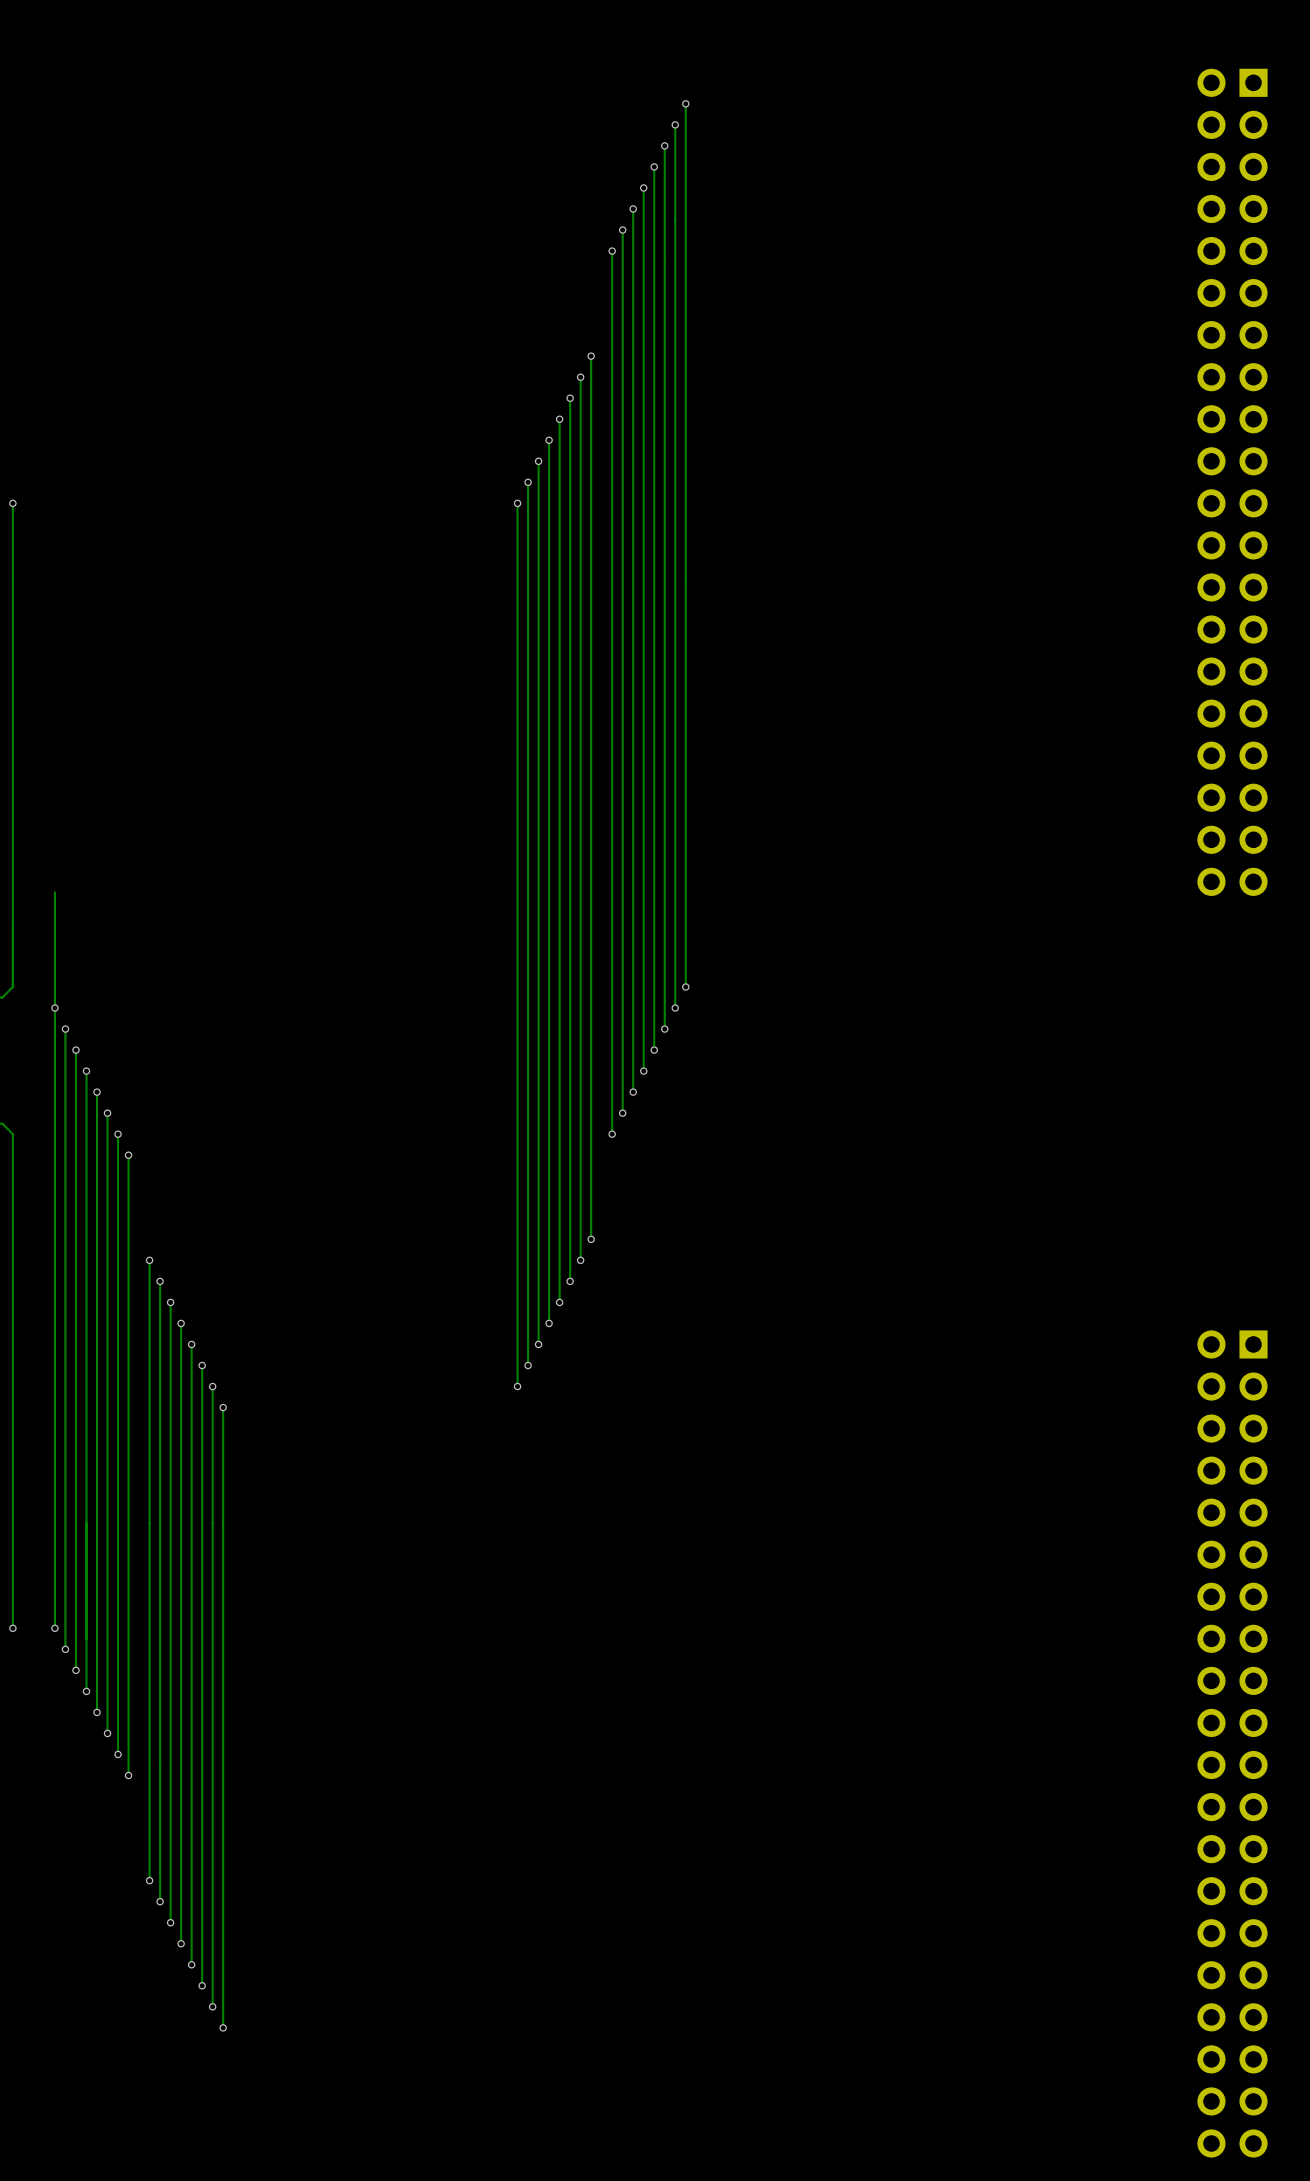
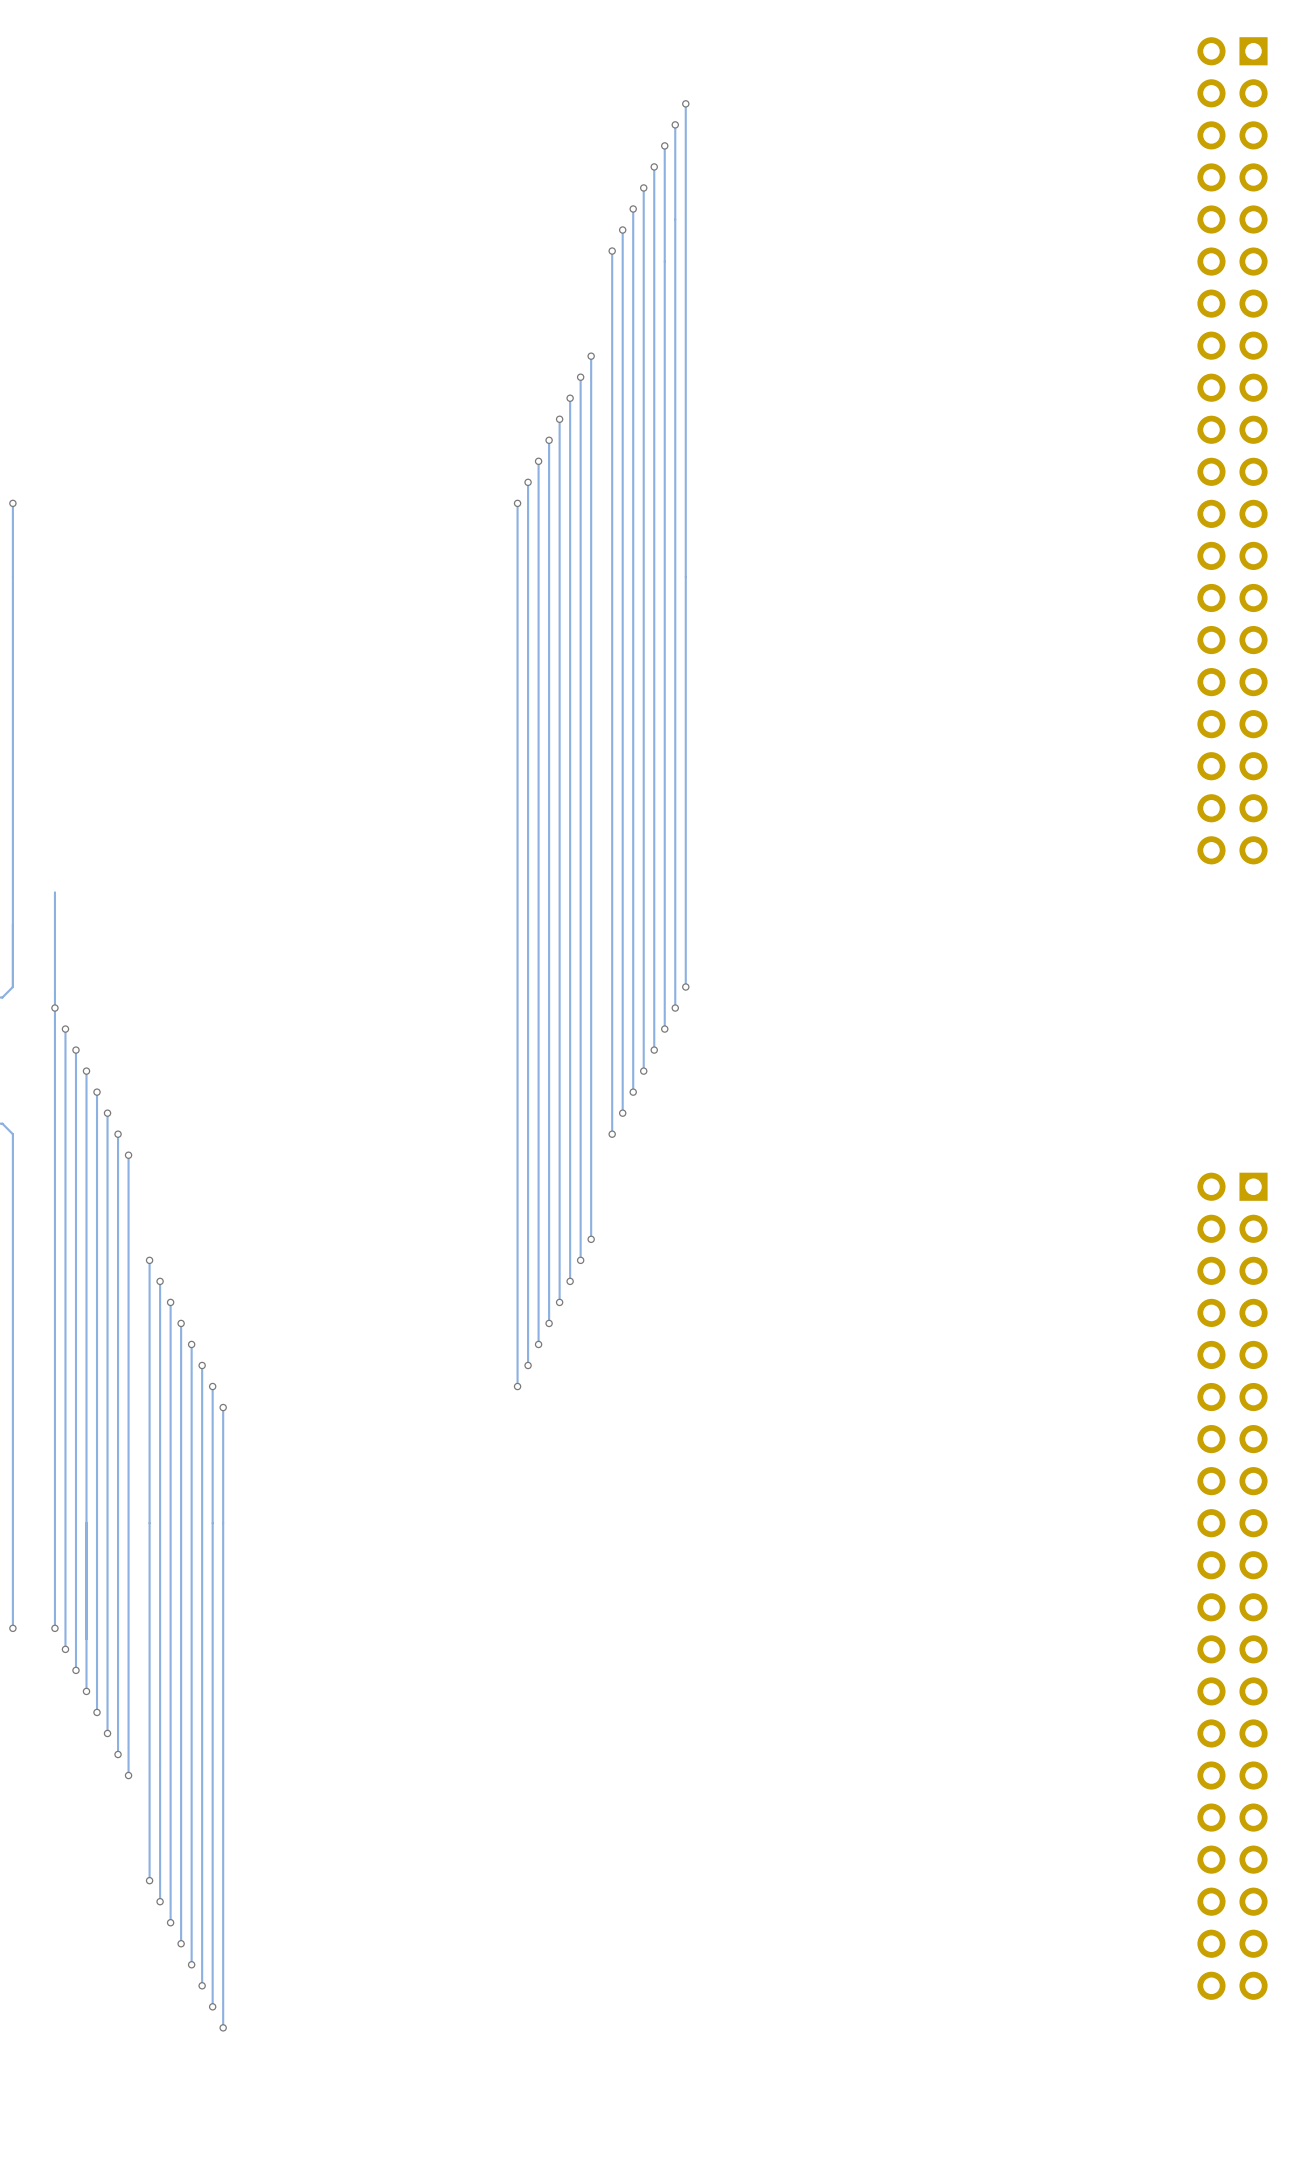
part position: (1232, 482) -> (1232, 450)
part position: (1232, 1743) -> (1232, 1586)

